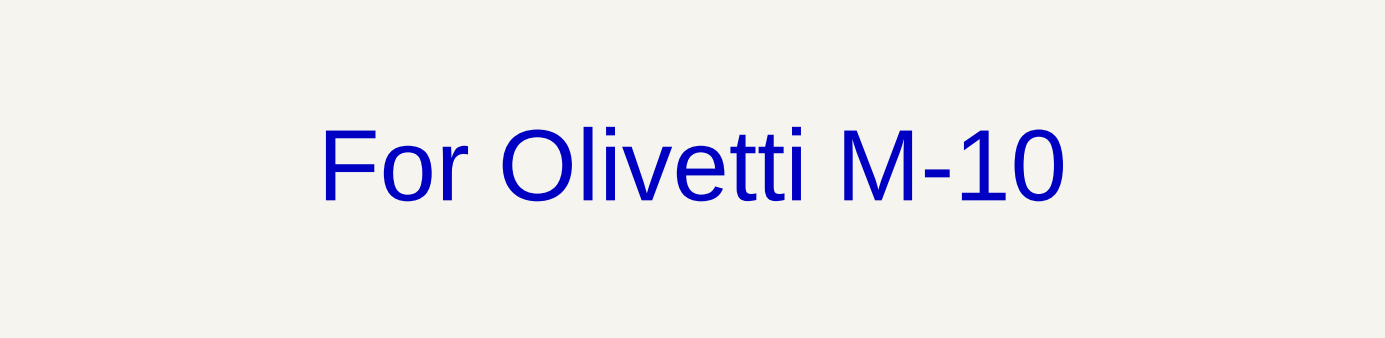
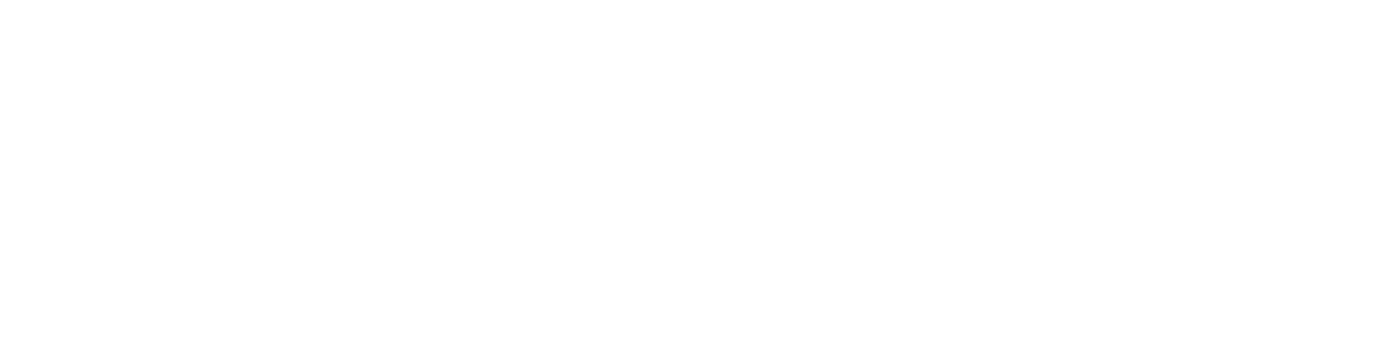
text: For Olivetti M-10 (694, 164) -> none

